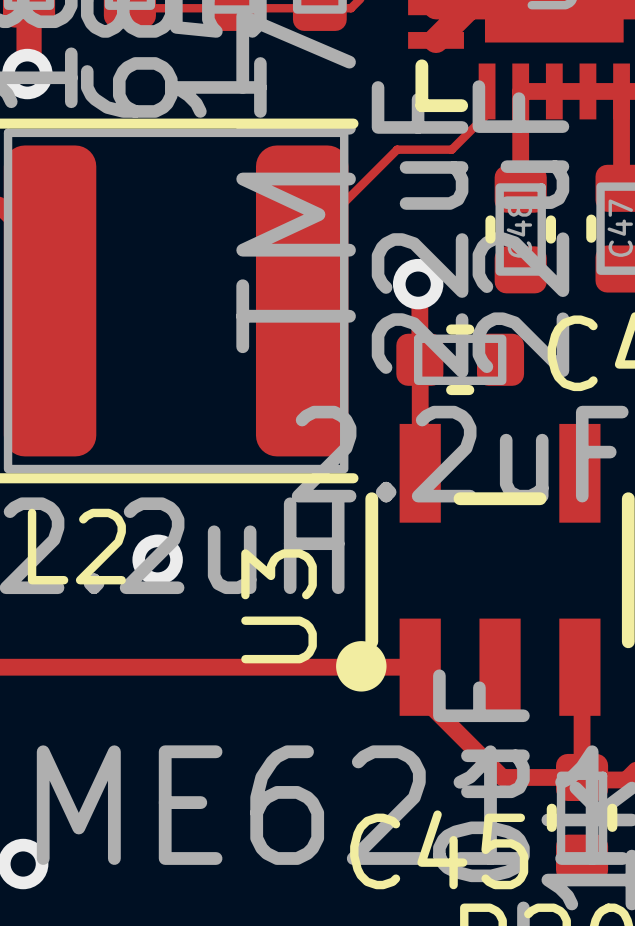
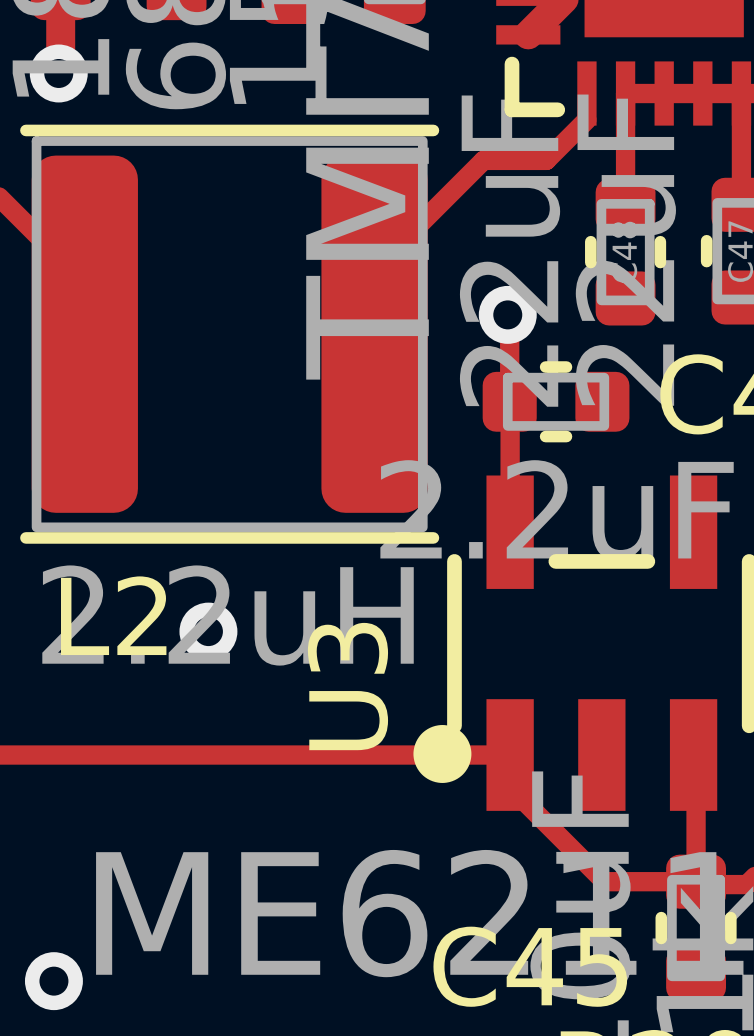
track width: thin (487, 114) (451, 149) (397, 149) (302, 244) -> thick (586, 119) (546, 160) (483, 160) (374, 269)

